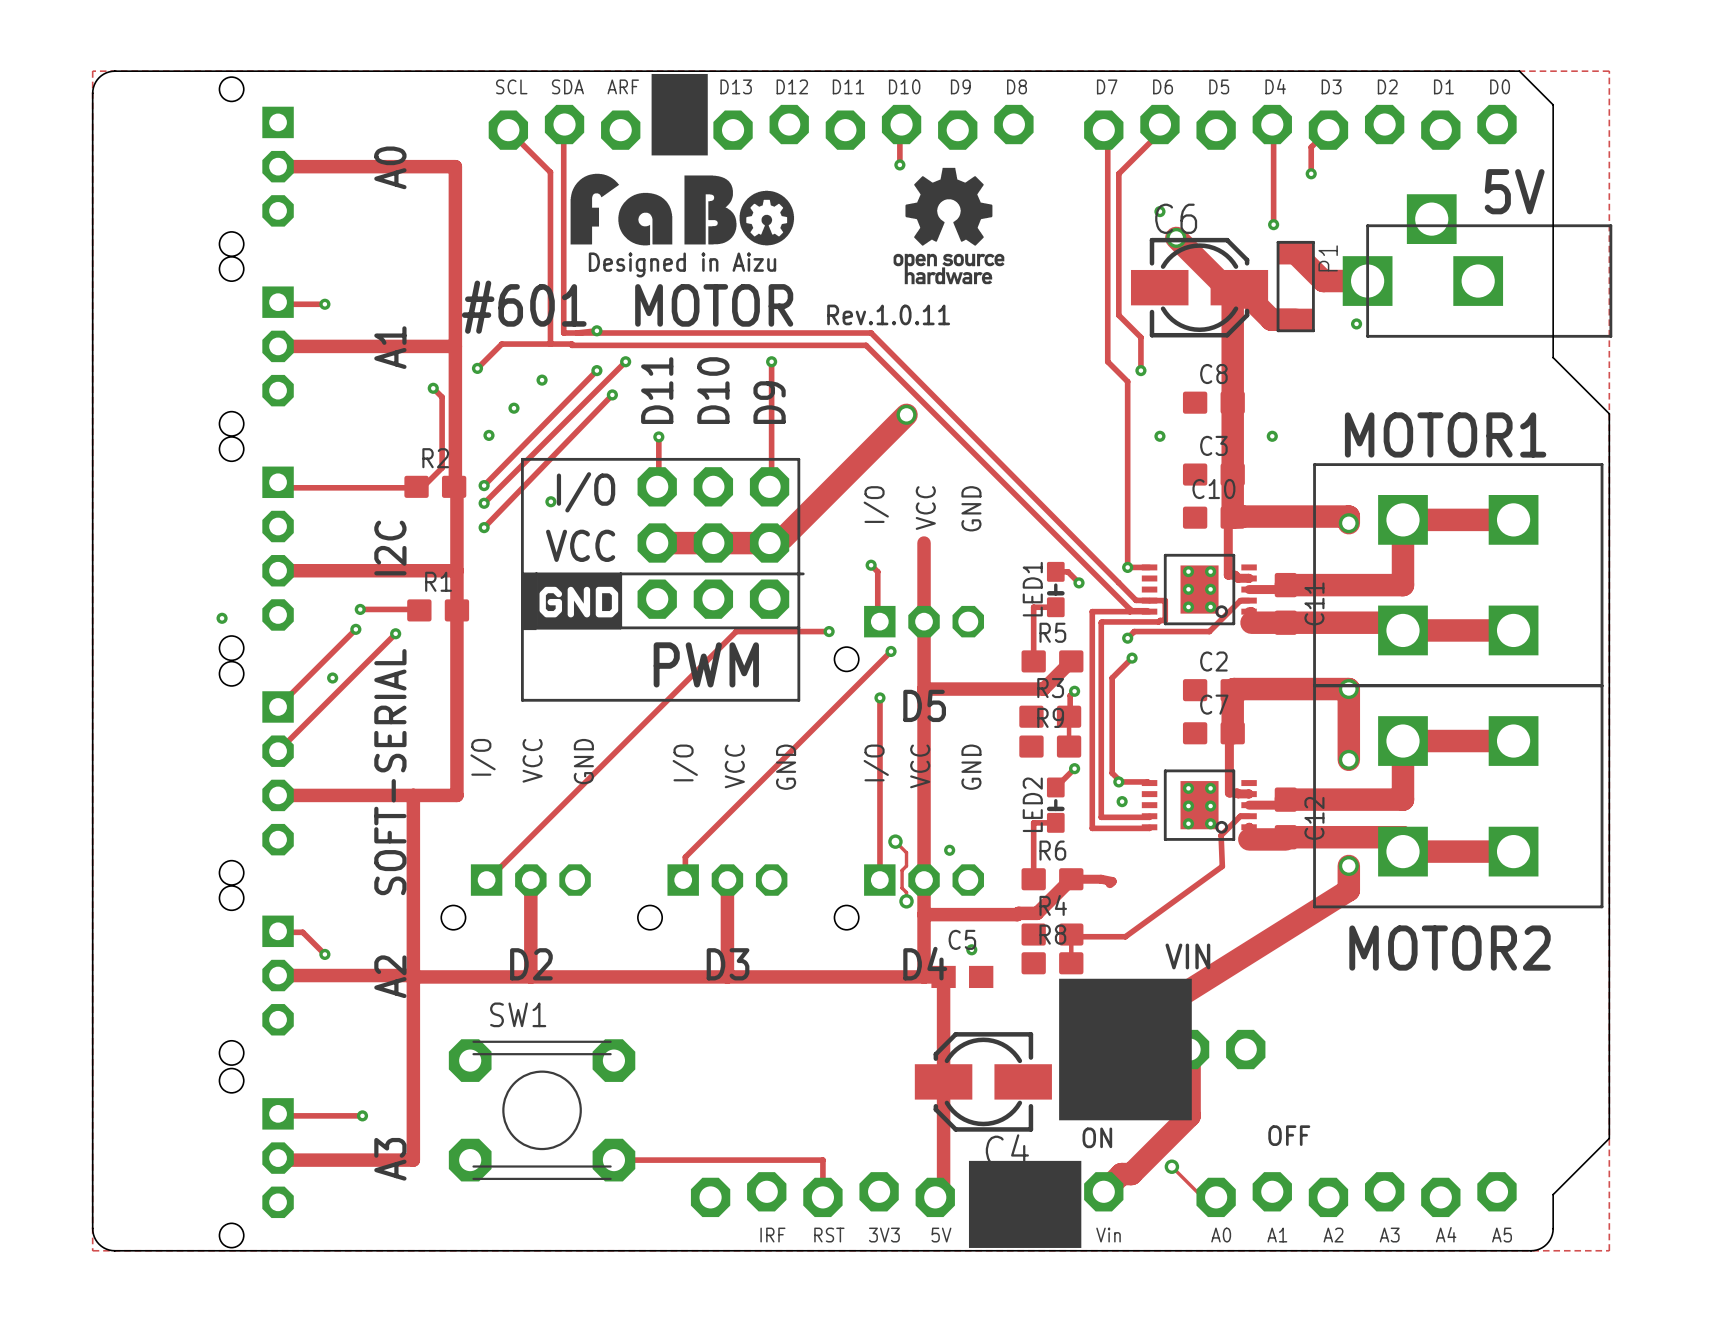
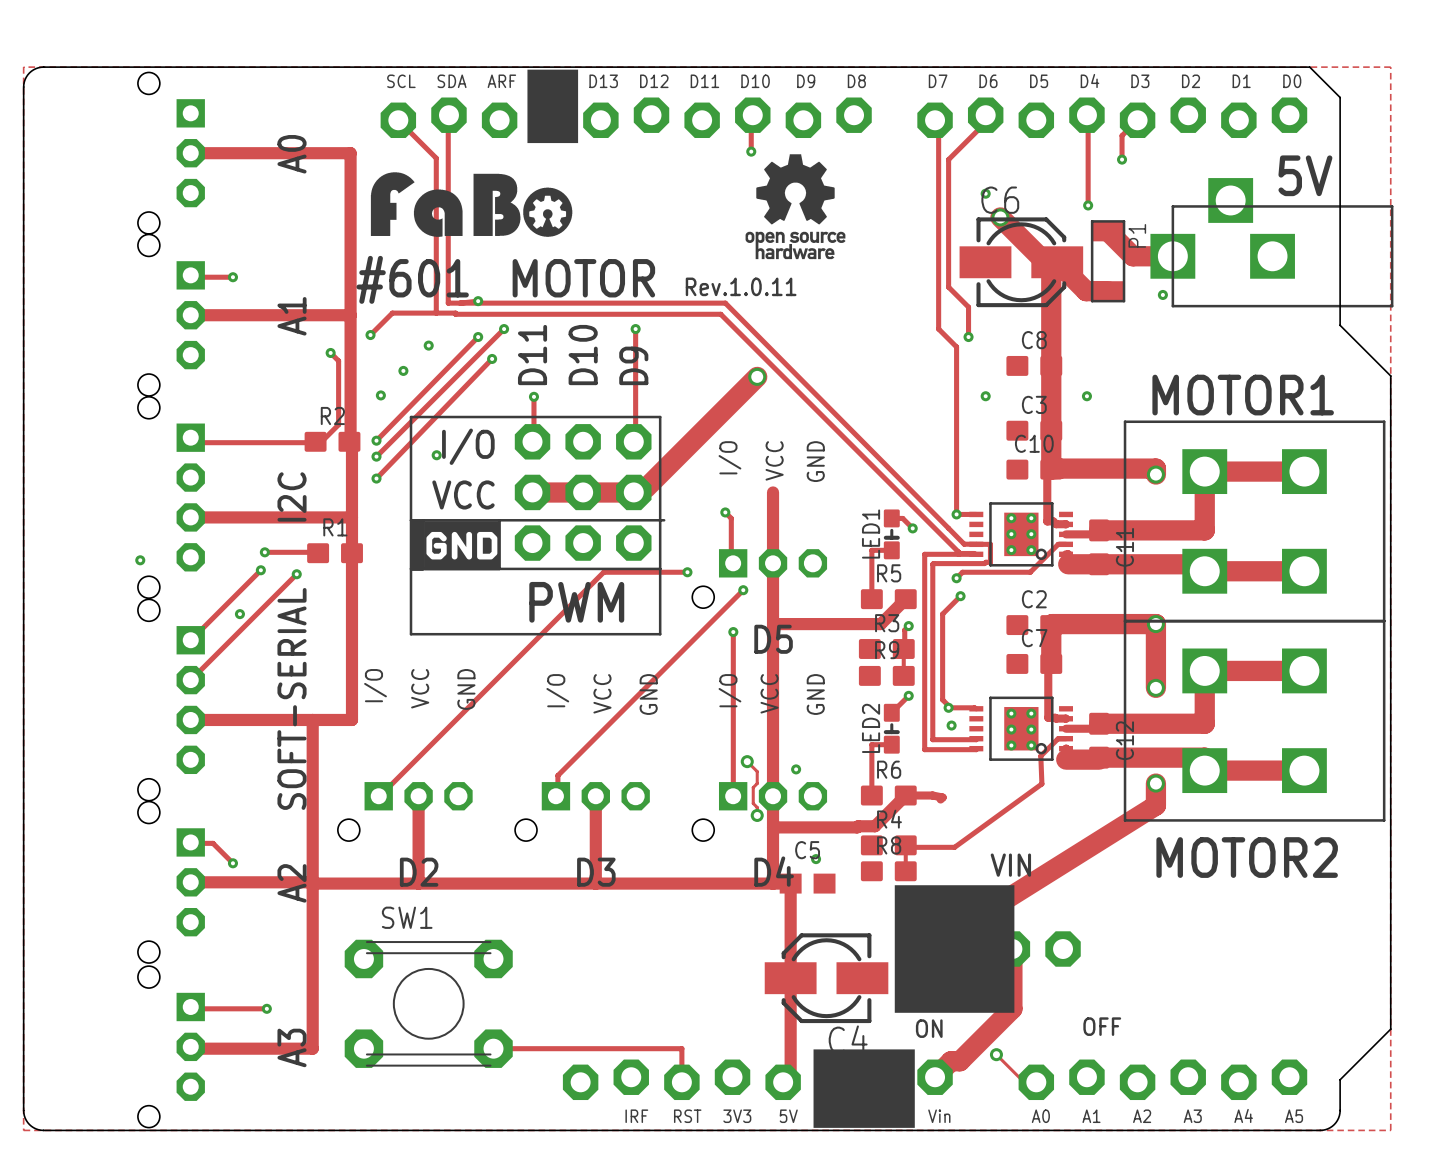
drawing position: (682, 209) -> (471, 204)
text: Designed in Aizu (682, 264) -> none

